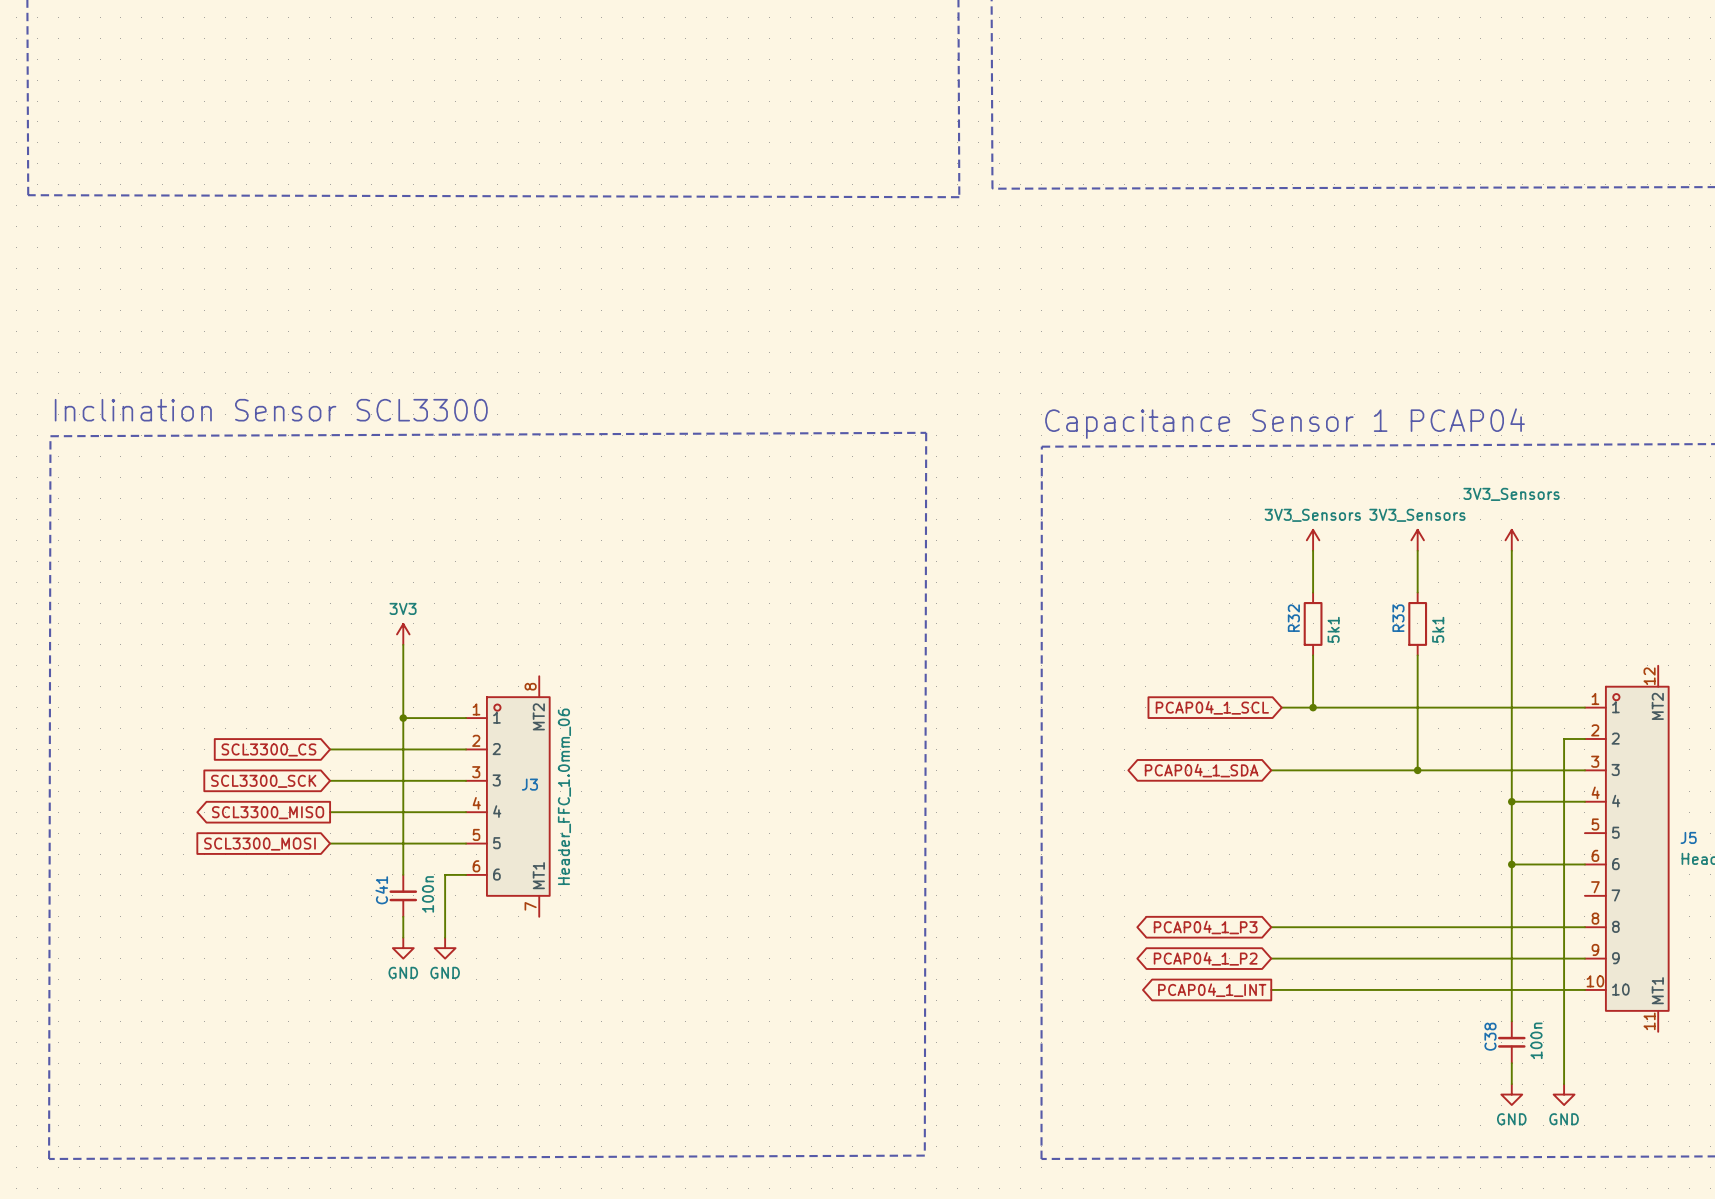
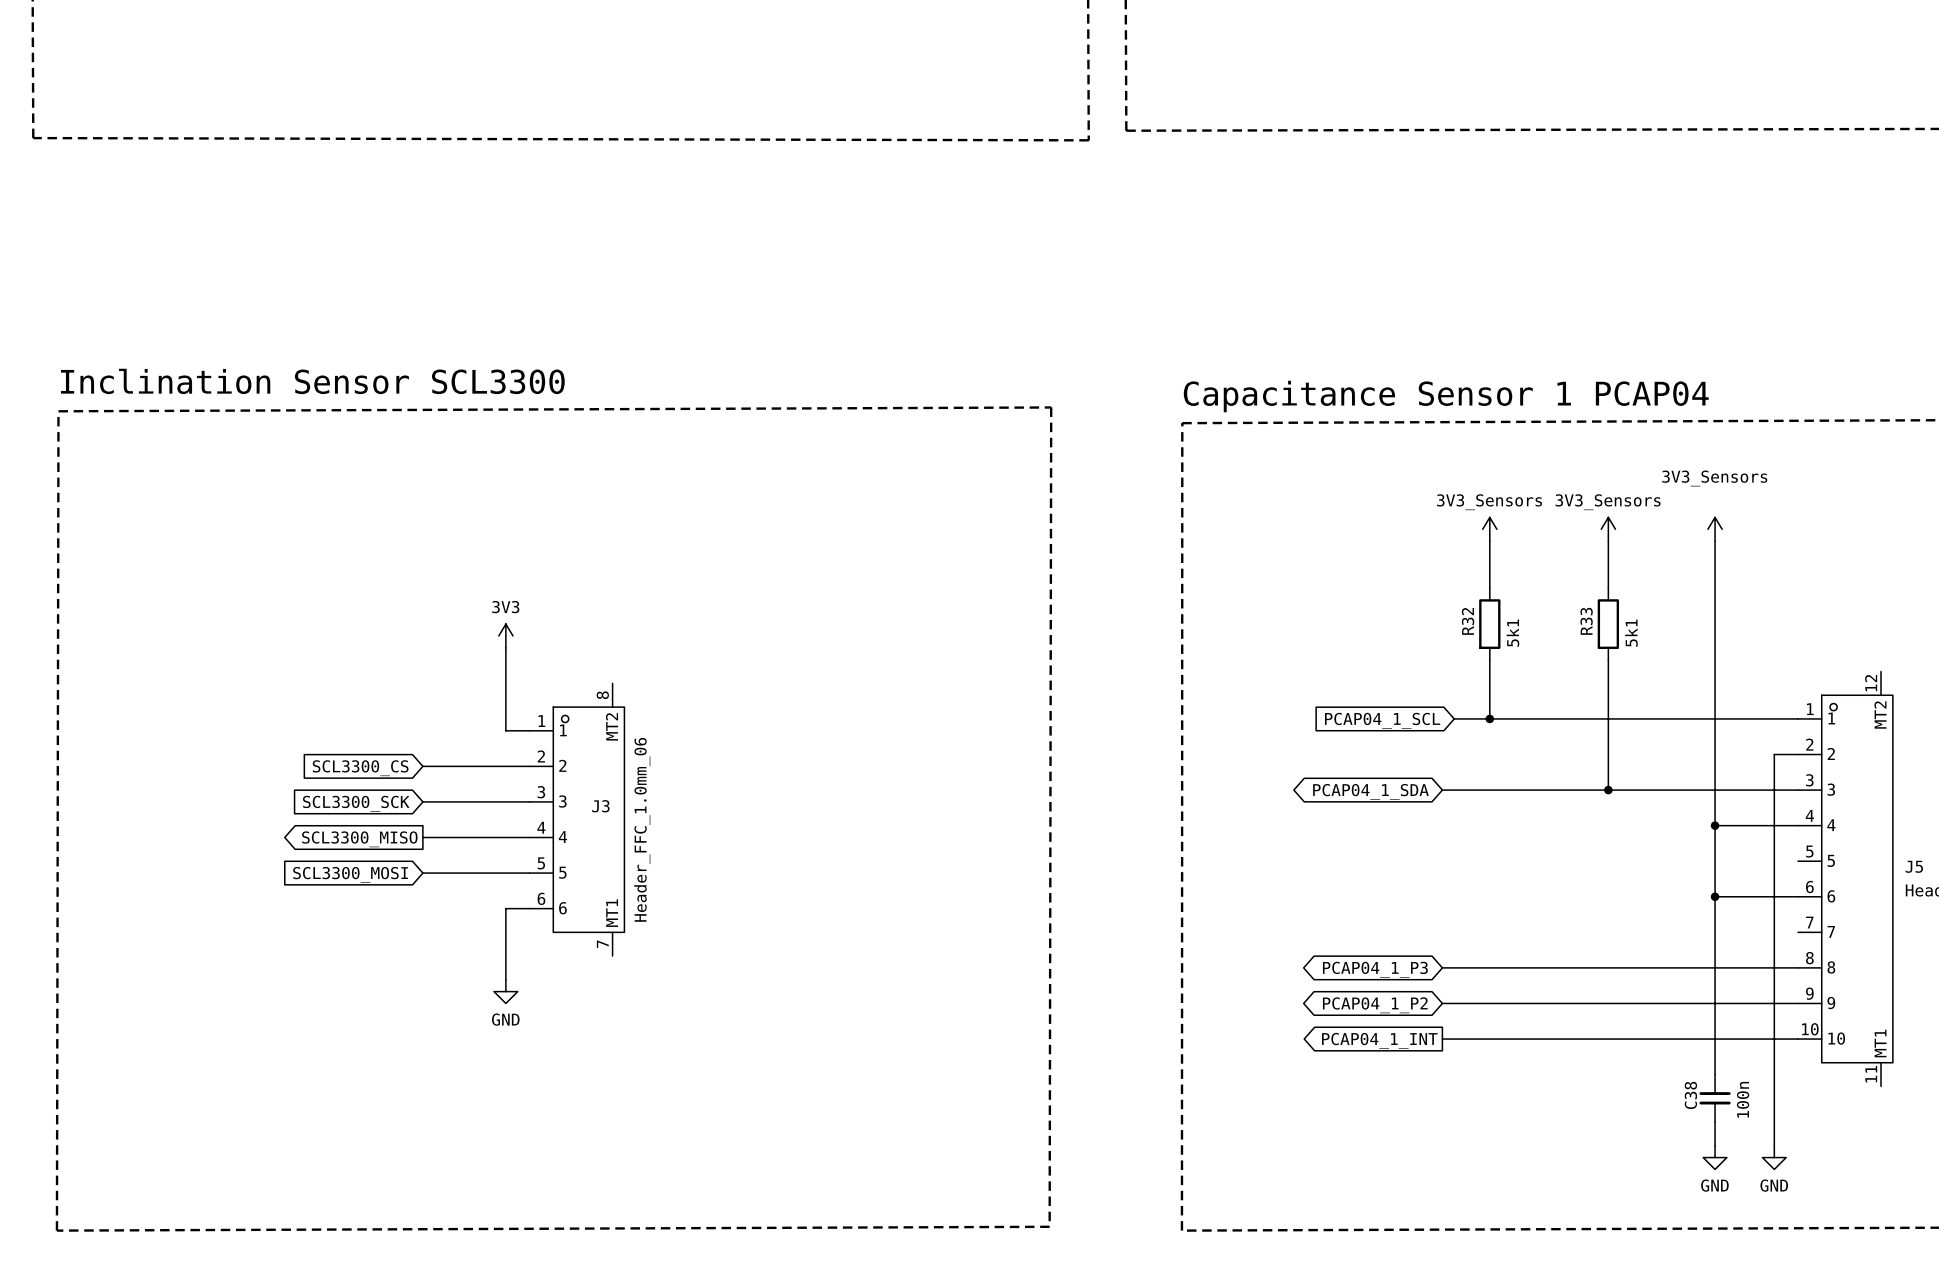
power symbol position: 3V3 (403, 634) -> 3V3 (505, 635)
wire: (403, 644) (403, 874) -> none
wire: (403, 718) (445, 718) -> (505, 647) (505, 730)
junction: (403, 718) -> none
global label position: SCL3300_CS (268, 749) -> SCL3300_CS (360, 768)
wire: (330, 749) (371, 749) -> none
wire: (330, 780) (371, 780) -> none
global label position: SCL3300_SCK (263, 781) -> SCL3300_SCK (356, 803)
global label position: SCL3300_MISO (268, 812) -> SCL3300_MISO (359, 839)
wire: (330, 812) (371, 812) -> none
wire: (330, 843) (371, 843) -> none
global label position: SCL3300_MOSI (259, 844) -> SCL3300_MOSI (350, 874)
C41: 100n (403, 895) -> none
wire: (403, 916) (403, 937) -> none
power symbol: GND (403, 948) -> none

